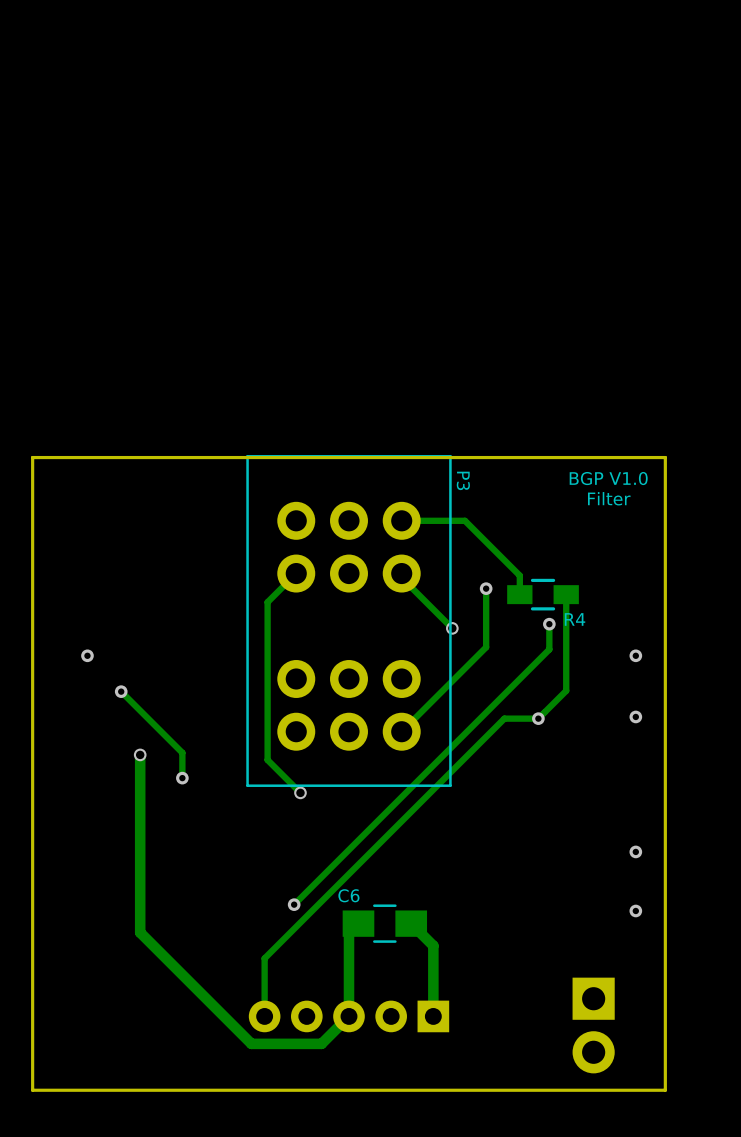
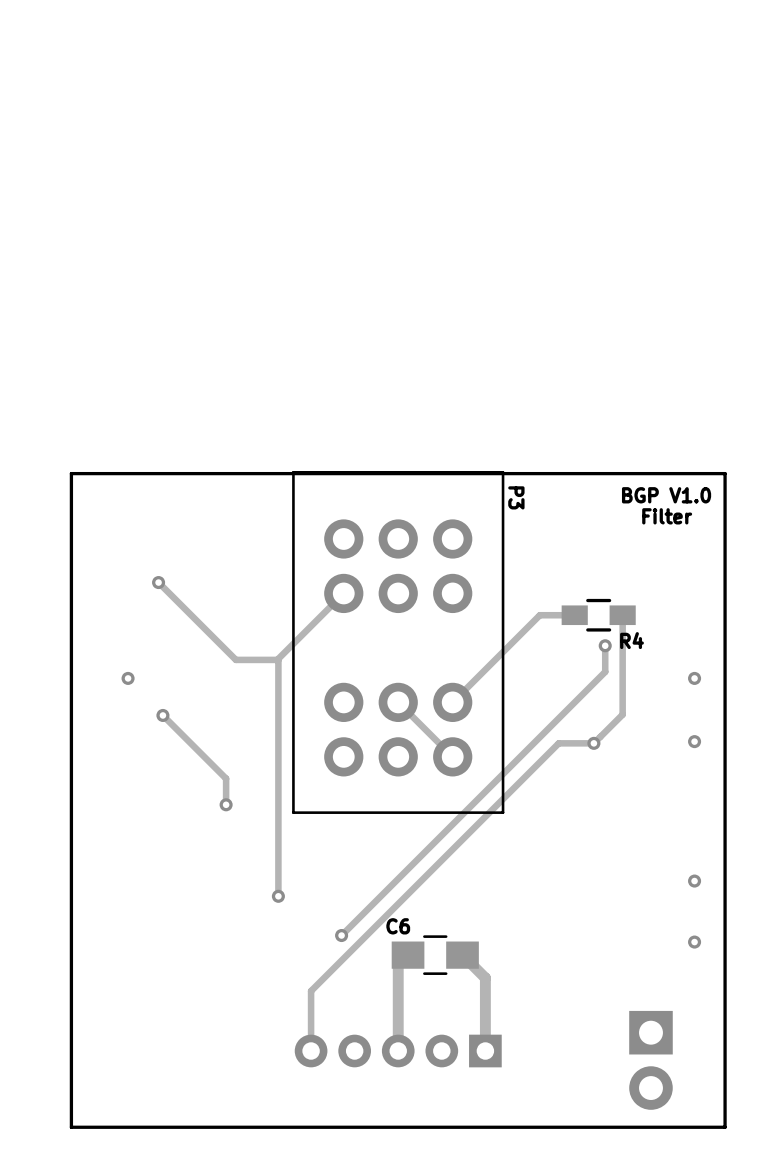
track: (401, 520) (464, 520) (519, 575) (519, 594) -> (452, 702) (539, 615) (574, 615)
track: none -> (158, 582) (235, 659) (278, 659) (278, 896)
via: none -> (158, 582)
track: (401, 573) (401, 577) (452, 628) -> none
track: (486, 588) (486, 647) (401, 731) -> (398, 702) (452, 756)
via: (486, 588) -> none
track: (267, 602) (267, 760) (300, 792) -> (314, 623) (277, 659)
via: (452, 628) -> none
track: (140, 754) (140, 932) (251, 1043) (321, 1043) (348, 1016) -> none
via: (140, 754) -> none
via: (300, 792) -> none
via: none -> (278, 896)

